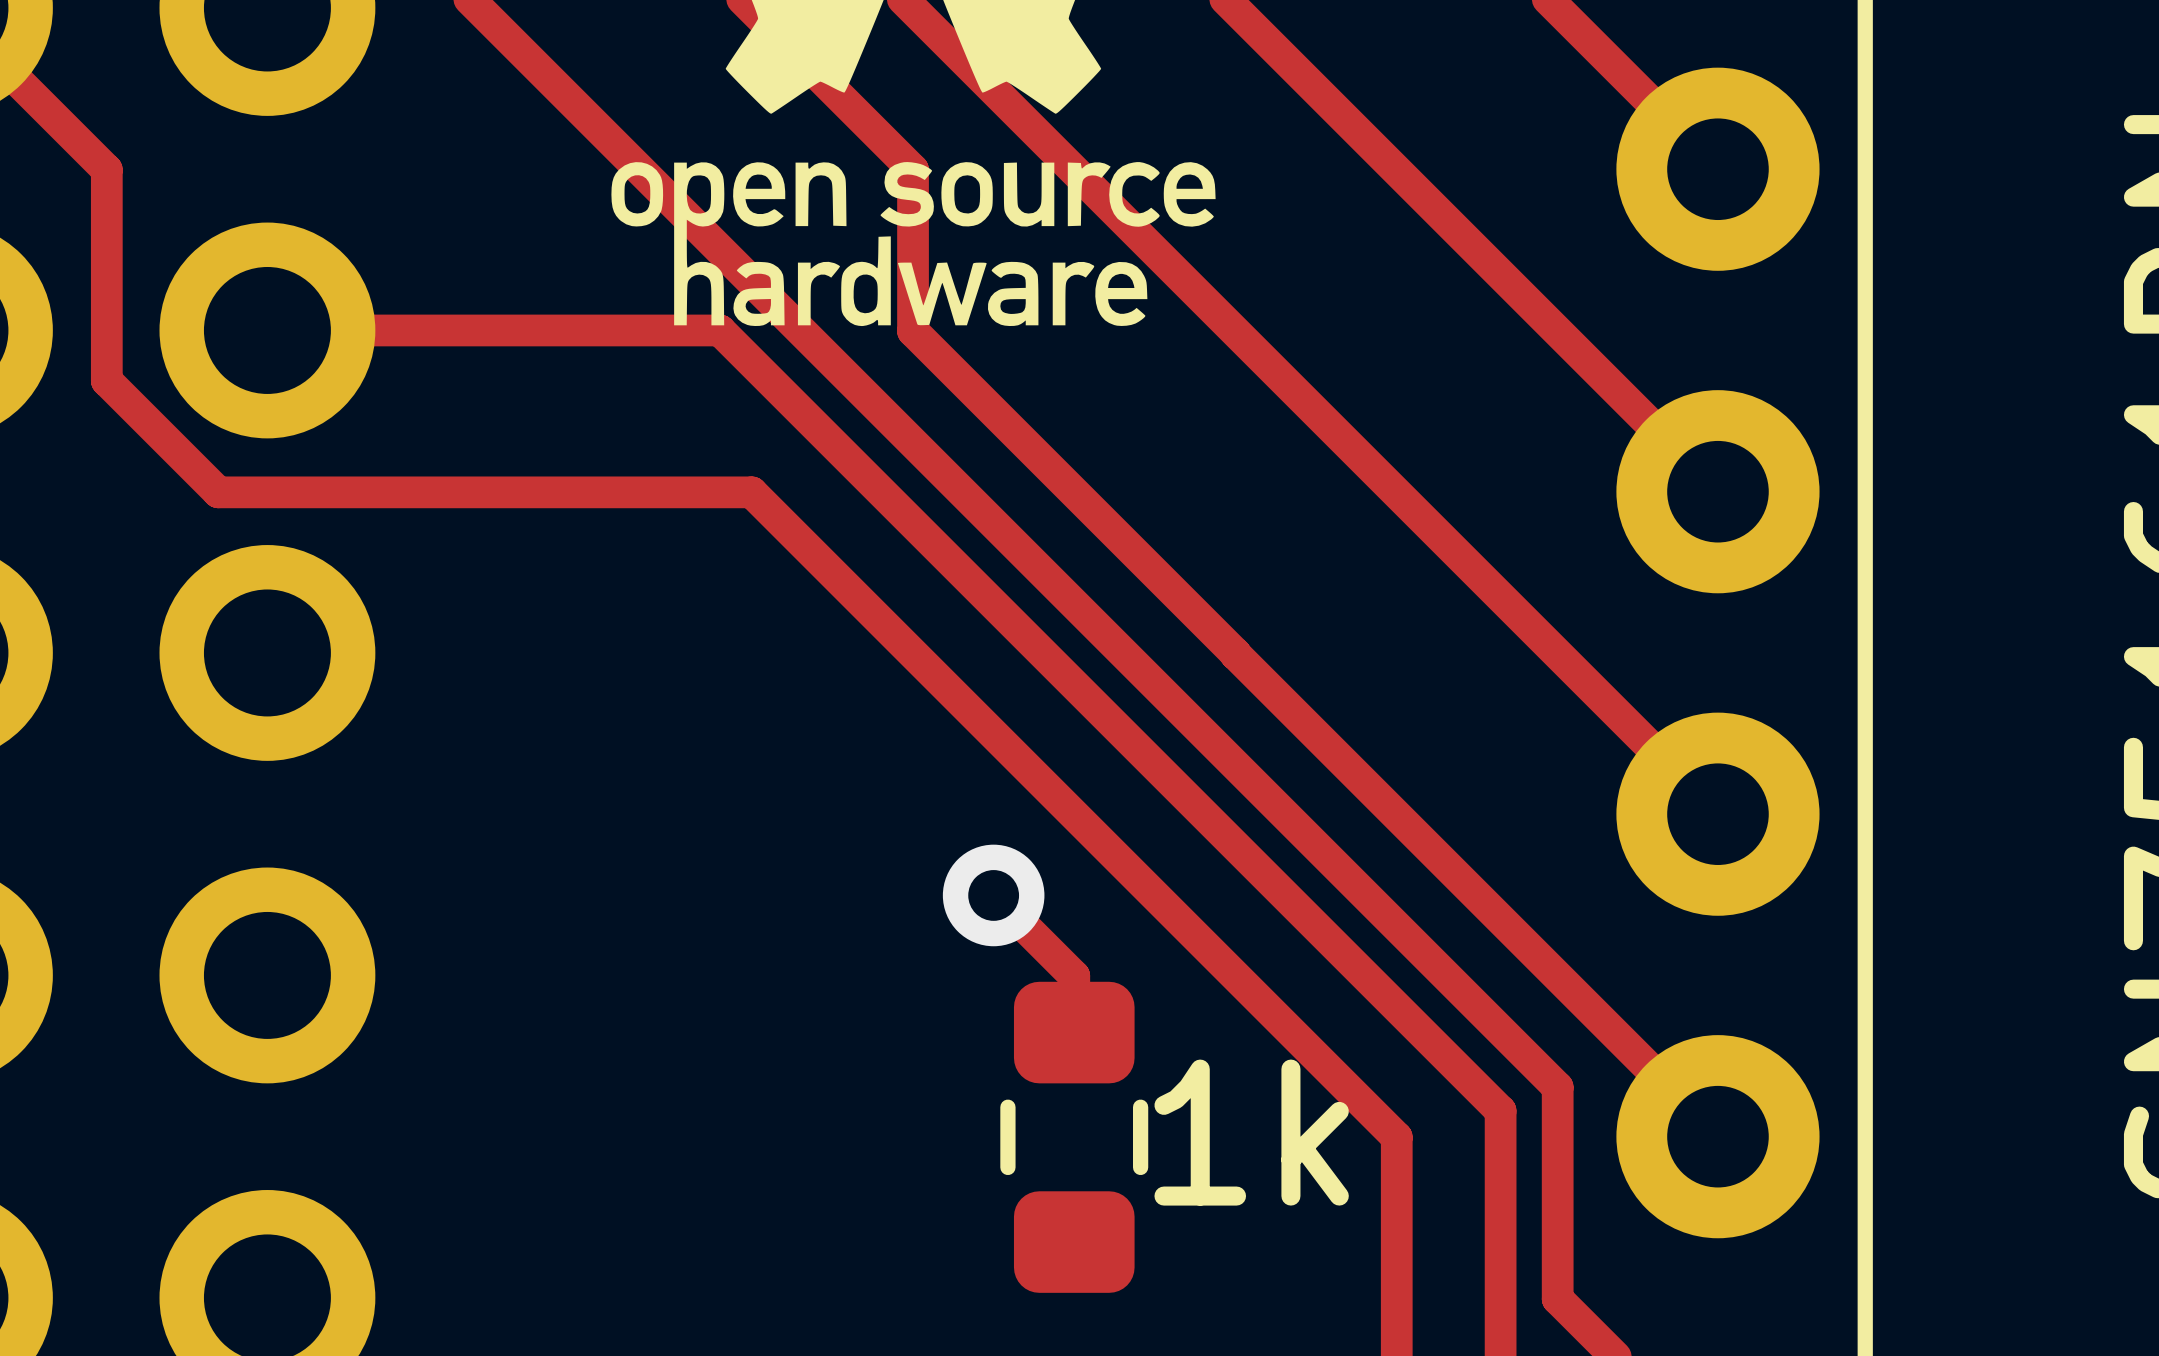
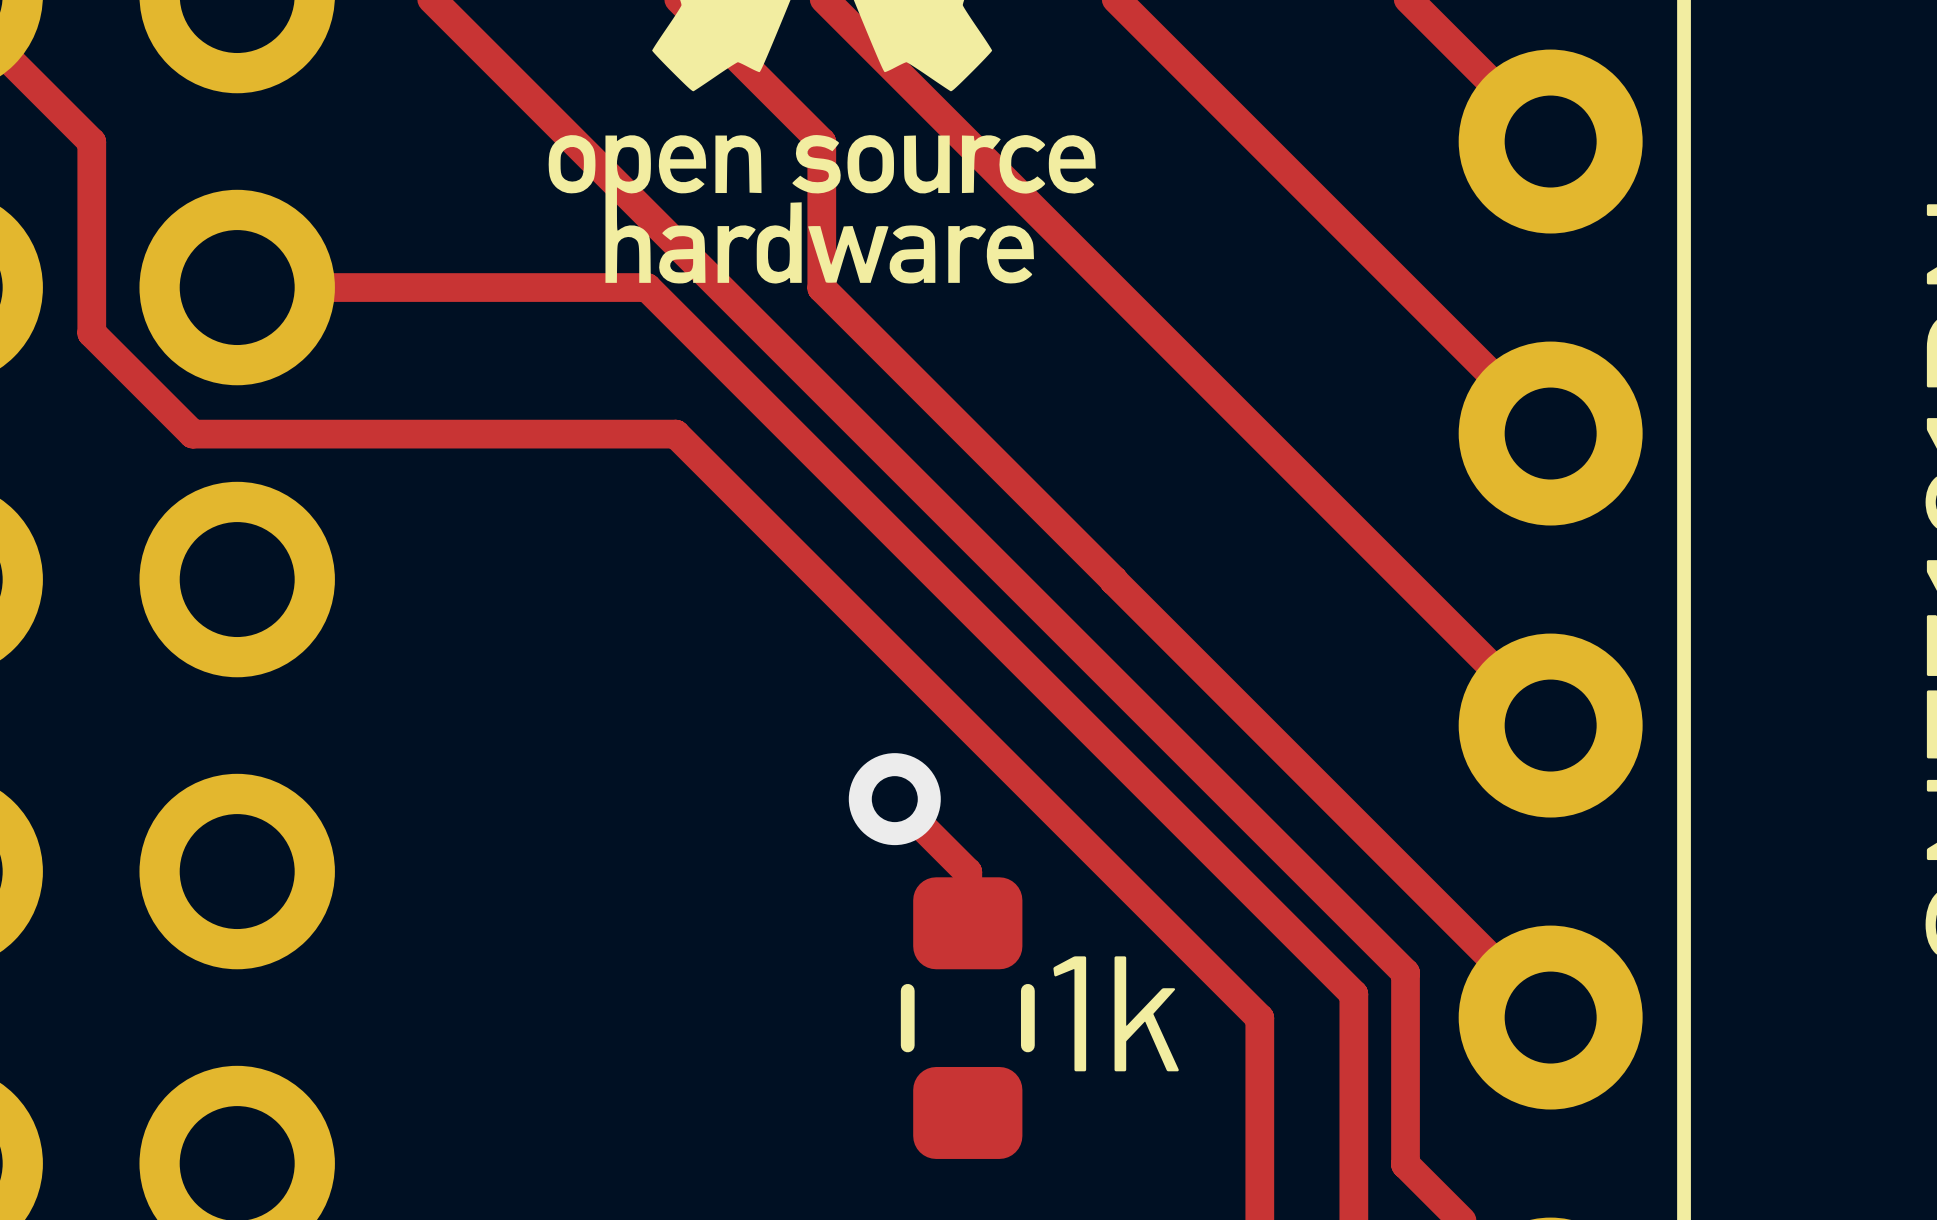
part value position: 1k (1251, 1132) -> 1k (1116, 1013)

